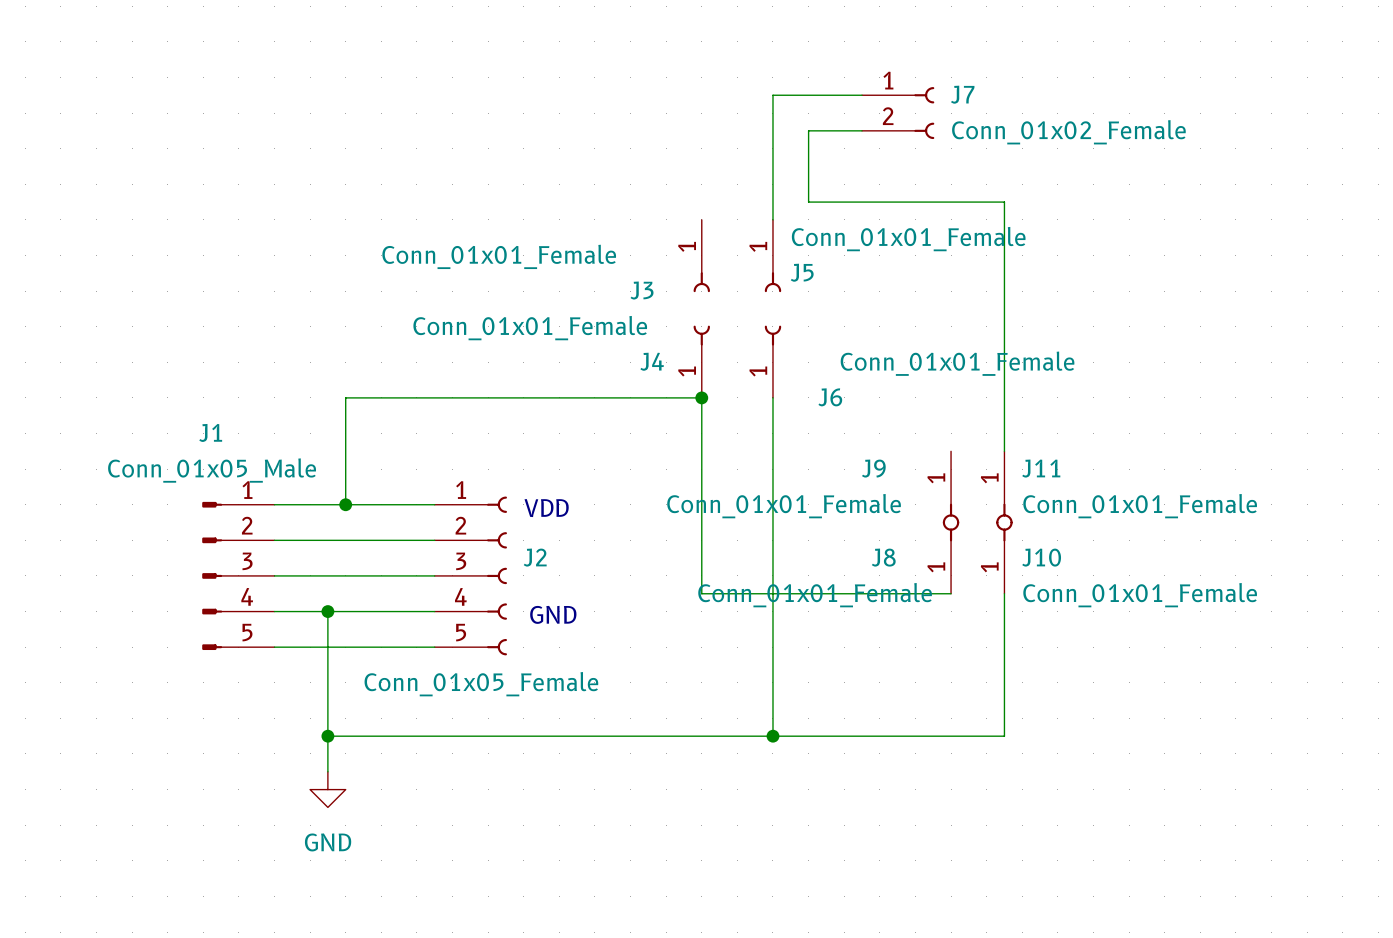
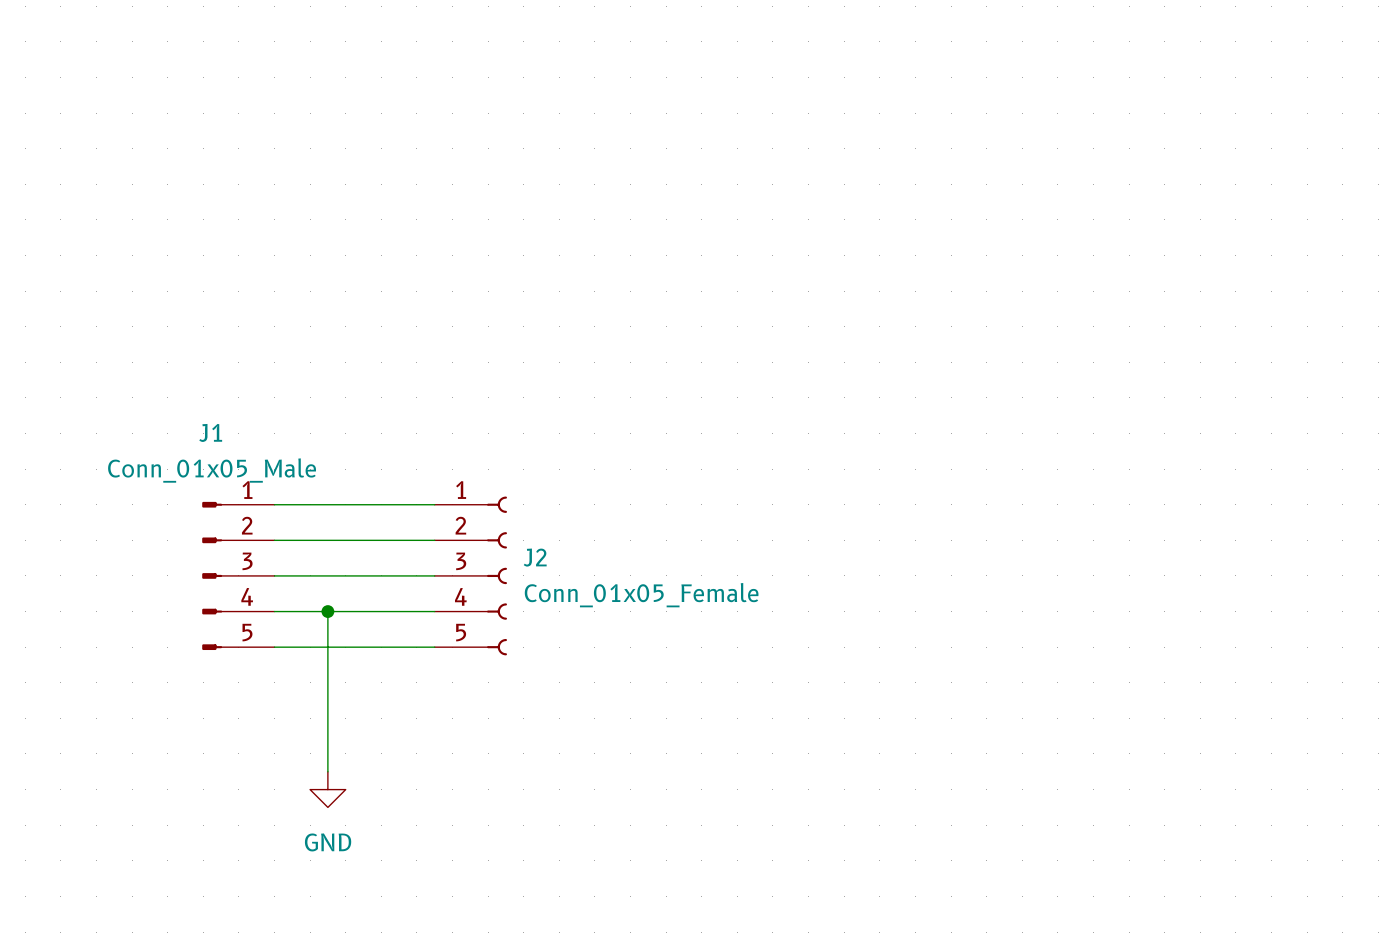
wire: (862, 95) (772, 95) (772, 219) -> none
J7: Conn_01x02_Female (898, 113) -> none
wire: (862, 130) (808, 130) (808, 202) (1004, 202) (1004, 451) -> none
J3: Conn_01x01_Female (701, 256) -> none
J5: Conn_01x01_Female (772, 256) -> none
J4: Conn_01x01_Female (701, 361) -> none
J6: Conn_01x01_Female (772, 361) -> none
junction: (701, 397) -> none
wire: (772, 397) (772, 736) -> none
J9: Conn_01x01_Female (951, 487) -> none
J11: Conn_01x01_Female (1004, 487) -> none
wire: (345, 504) (345, 397) (701, 397) (701, 593) (951, 593) -> none
junction: (345, 504) -> none
text: VDD (546, 508) -> none
J8: Conn_01x01_Female (951, 557) -> none
J10: Conn_01x01_Female (1004, 557) -> none
wire: (1004, 593) (1004, 736) (327, 736) -> none
text: GND (553, 614) -> none
J2 value position: Conn_01x05_Female (481, 684) -> Conn_01x05_Female (641, 595)
junction: (327, 736) -> none
junction: (772, 736) -> none

